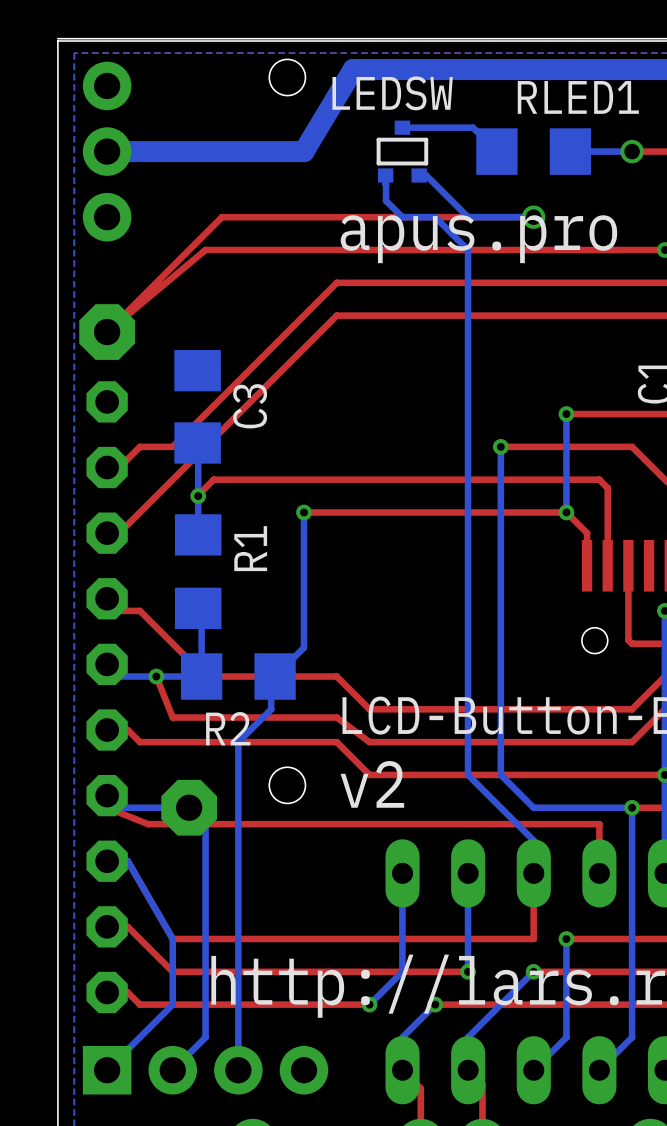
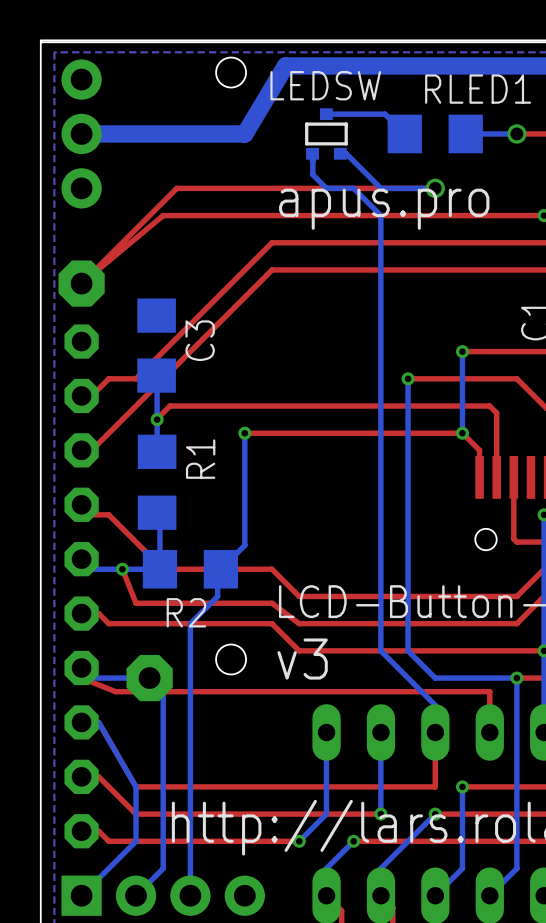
text: v2 (372, 784) -> v3 (302, 659)

